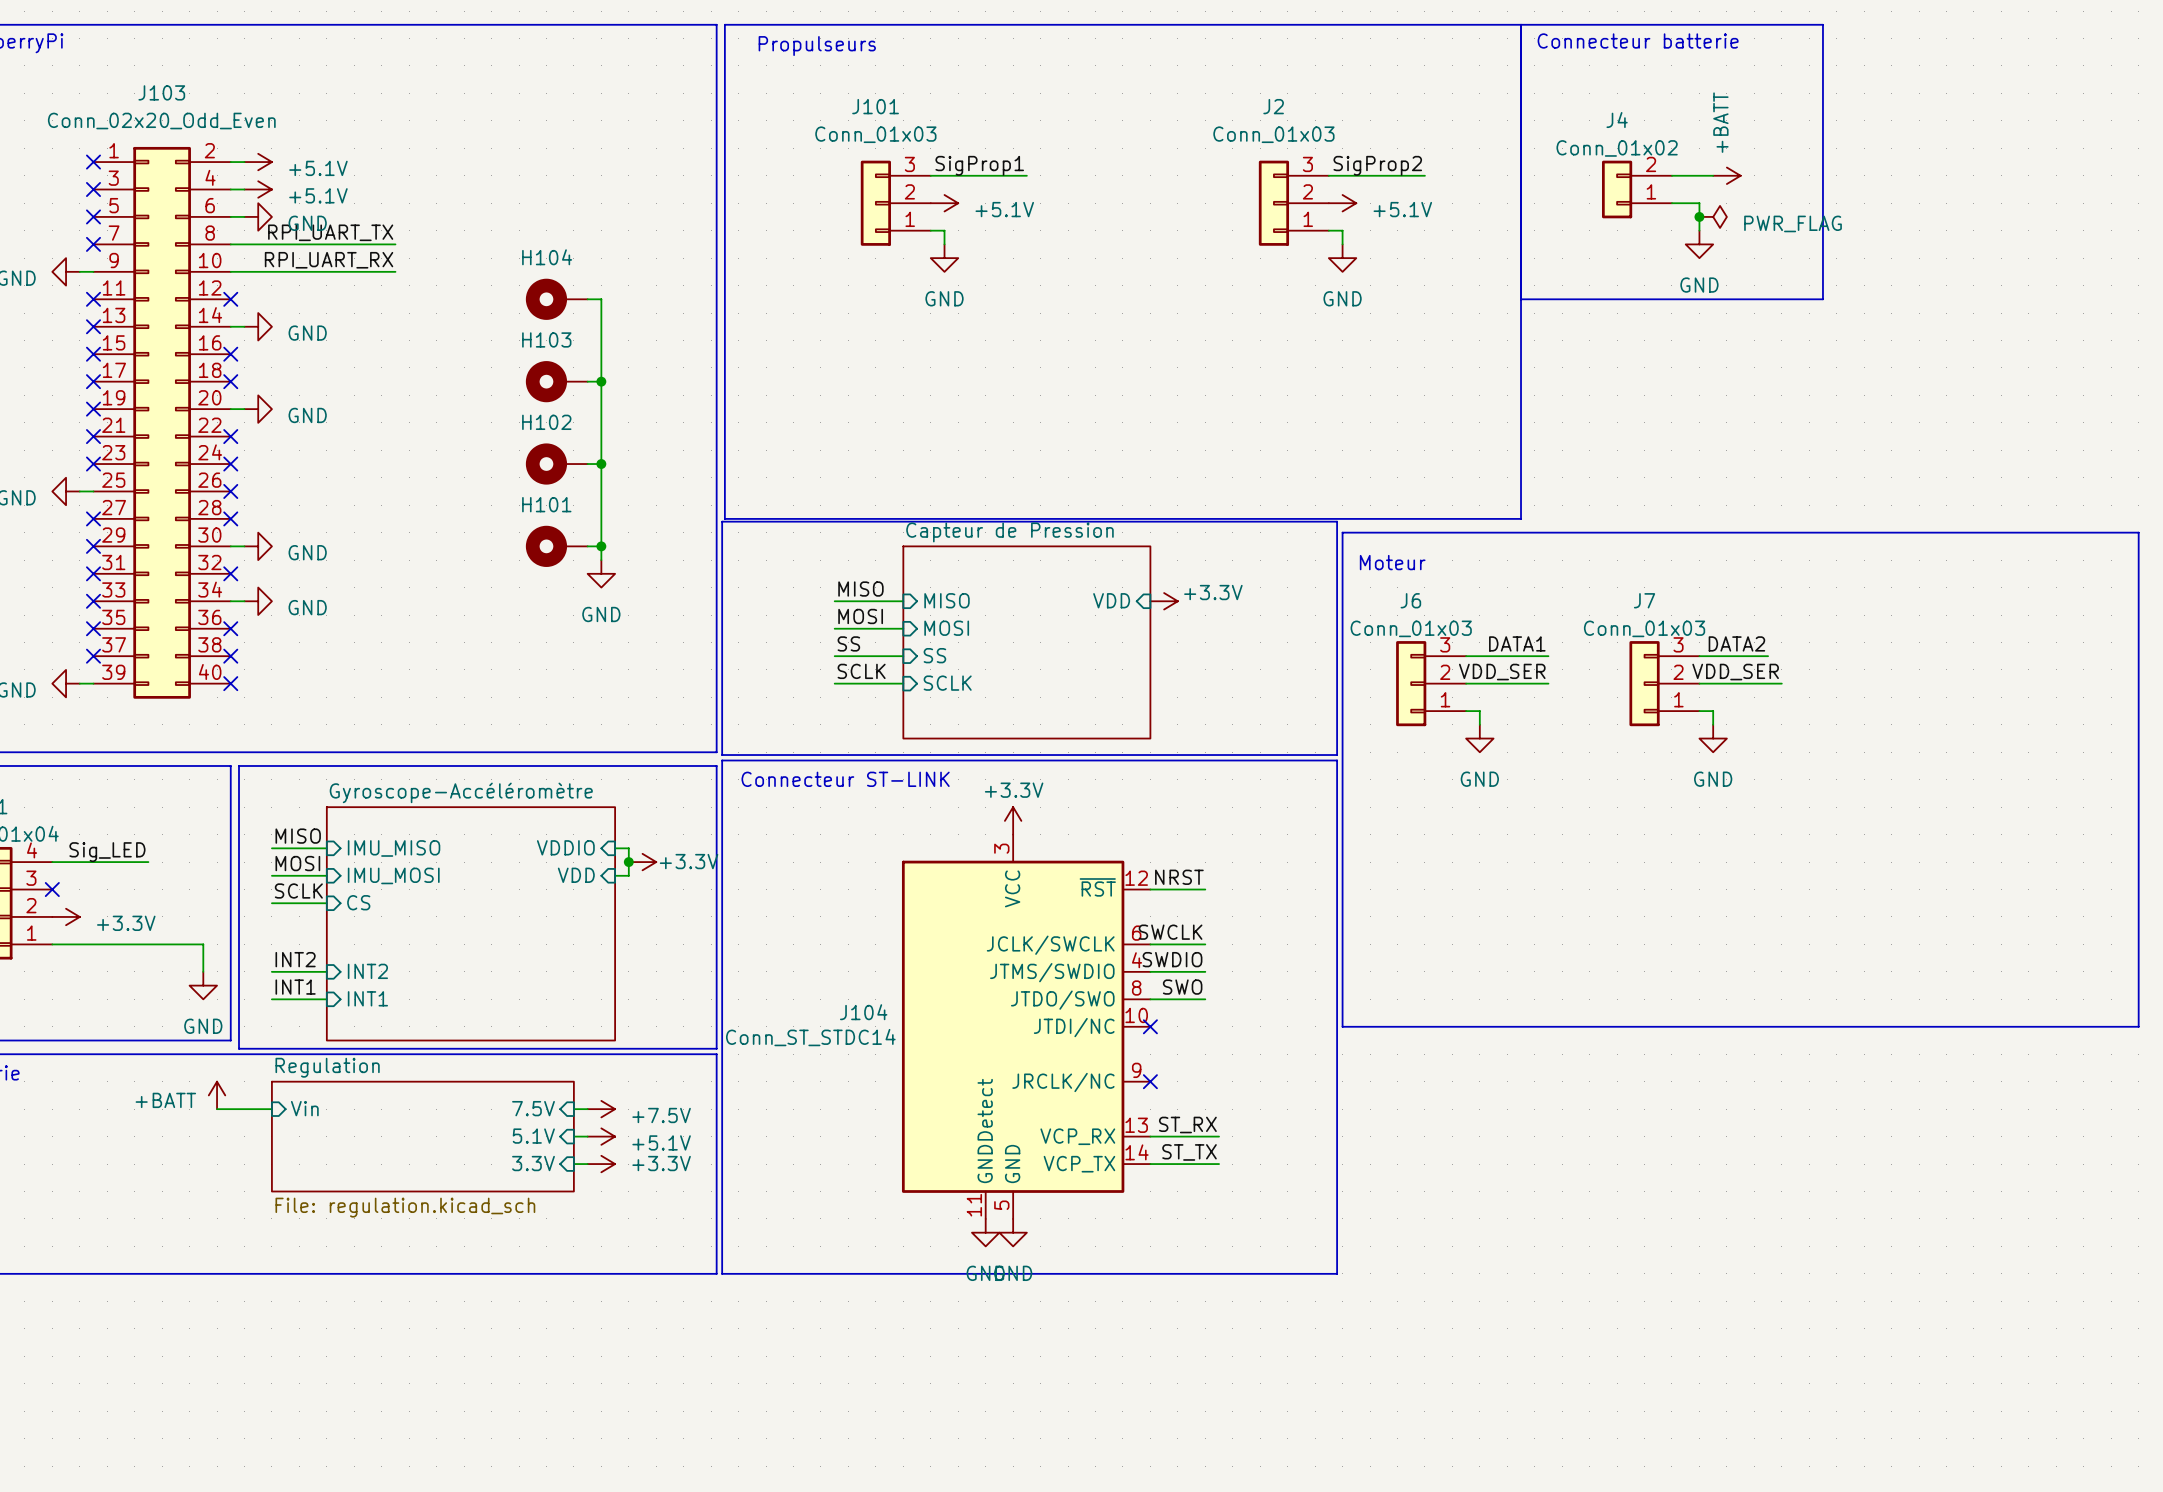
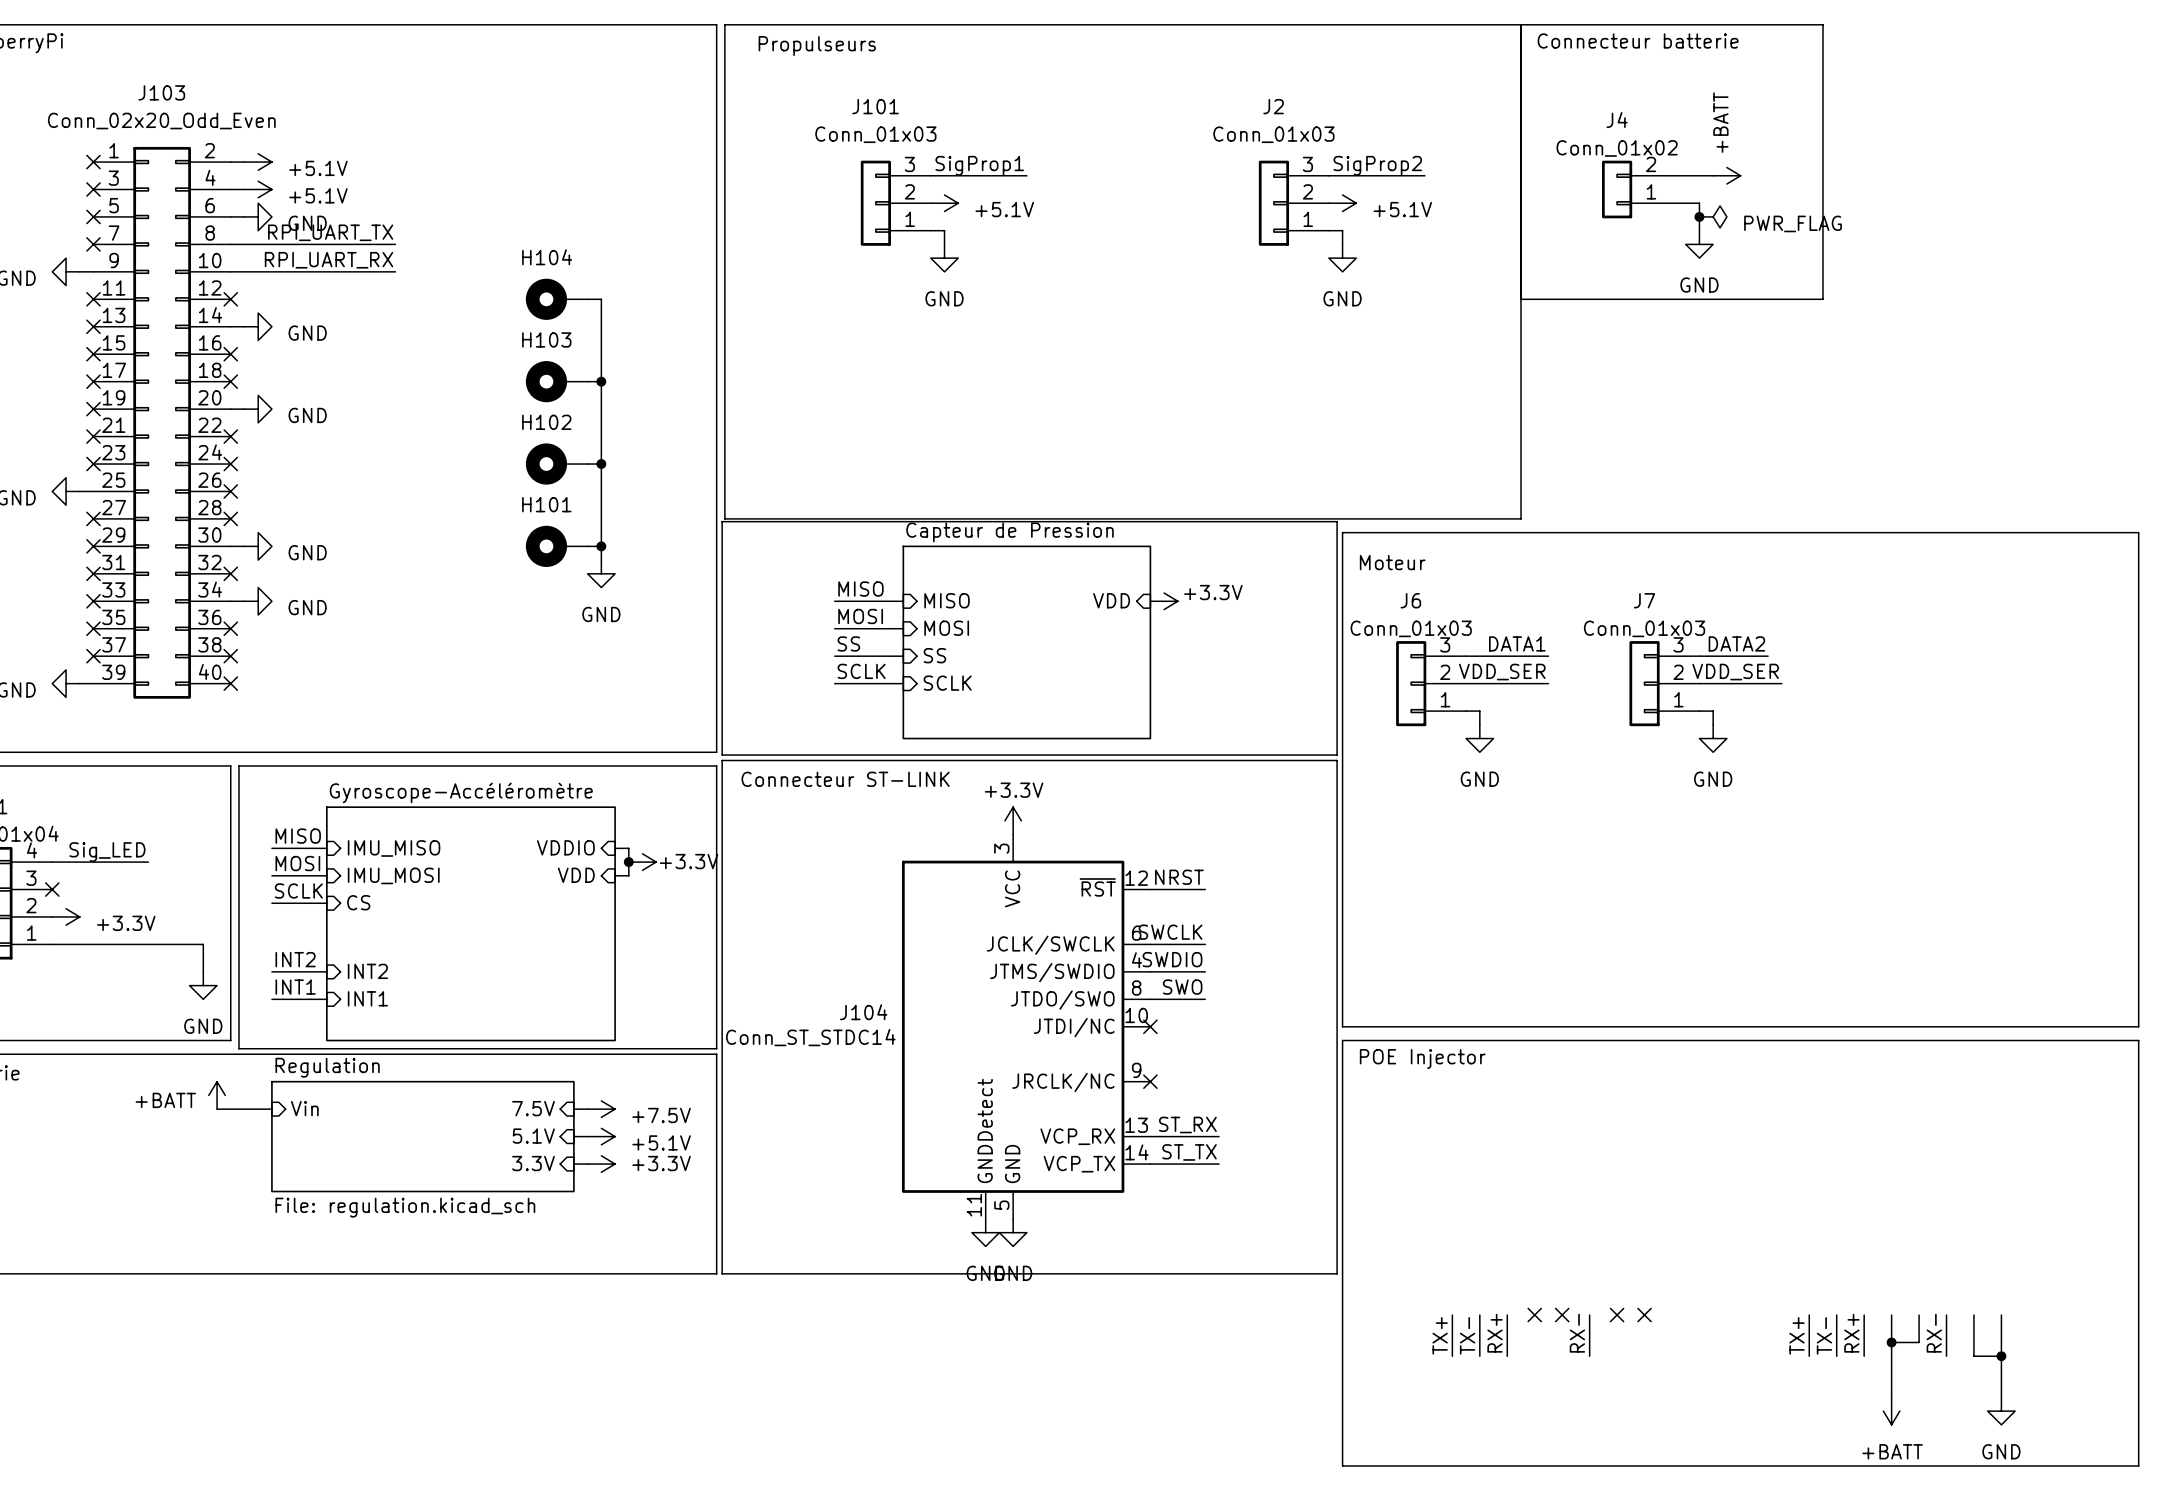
line: none -> (1342, 1040) (2138, 1040) (2138, 1466) (1342, 1466) (1342, 1040)
text: none -> POE Injector (1422, 1059)
wire: none -> (1452, 1315) (1452, 1356)
wire: none -> (1479, 1315) (1479, 1356)
wire: none -> (1507, 1315) (1507, 1356)
no-connect mark: none -> (1534, 1315)
no-connect mark: none -> (1562, 1315)
wire: none -> (1589, 1315) (1589, 1356)
no-connect mark: none -> (1617, 1315)
no-connect mark: none -> (1644, 1315)
wire: none -> (1809, 1315) (1809, 1356)
wire: none -> (1836, 1315) (1836, 1356)
wire: none -> (1864, 1315) (1864, 1356)
wire: none -> (1891, 1315) (1891, 1397)
wire: none -> (1919, 1315) (1919, 1342) (1891, 1342)
wire: none -> (1946, 1315) (1946, 1356)
wire: none -> (1973, 1315) (1973, 1356) (2001, 1356)
wire: none -> (2001, 1315) (2001, 1397)
label: none -> RX+ (1495, 1333)
label: none -> RX- (1577, 1333)
label: none -> RX+ (1851, 1333)
label: none -> RX- (1934, 1333)
label: none -> TX+ (1440, 1335)
label: none -> TX- (1467, 1335)
label: none -> TX+ (1797, 1335)
label: none -> TX- (1824, 1335)
junction: none -> (1891, 1342)
junction: none -> (2001, 1356)
power symbol: none -> +BATT (1891, 1411)
power symbol: none -> GND (2001, 1411)

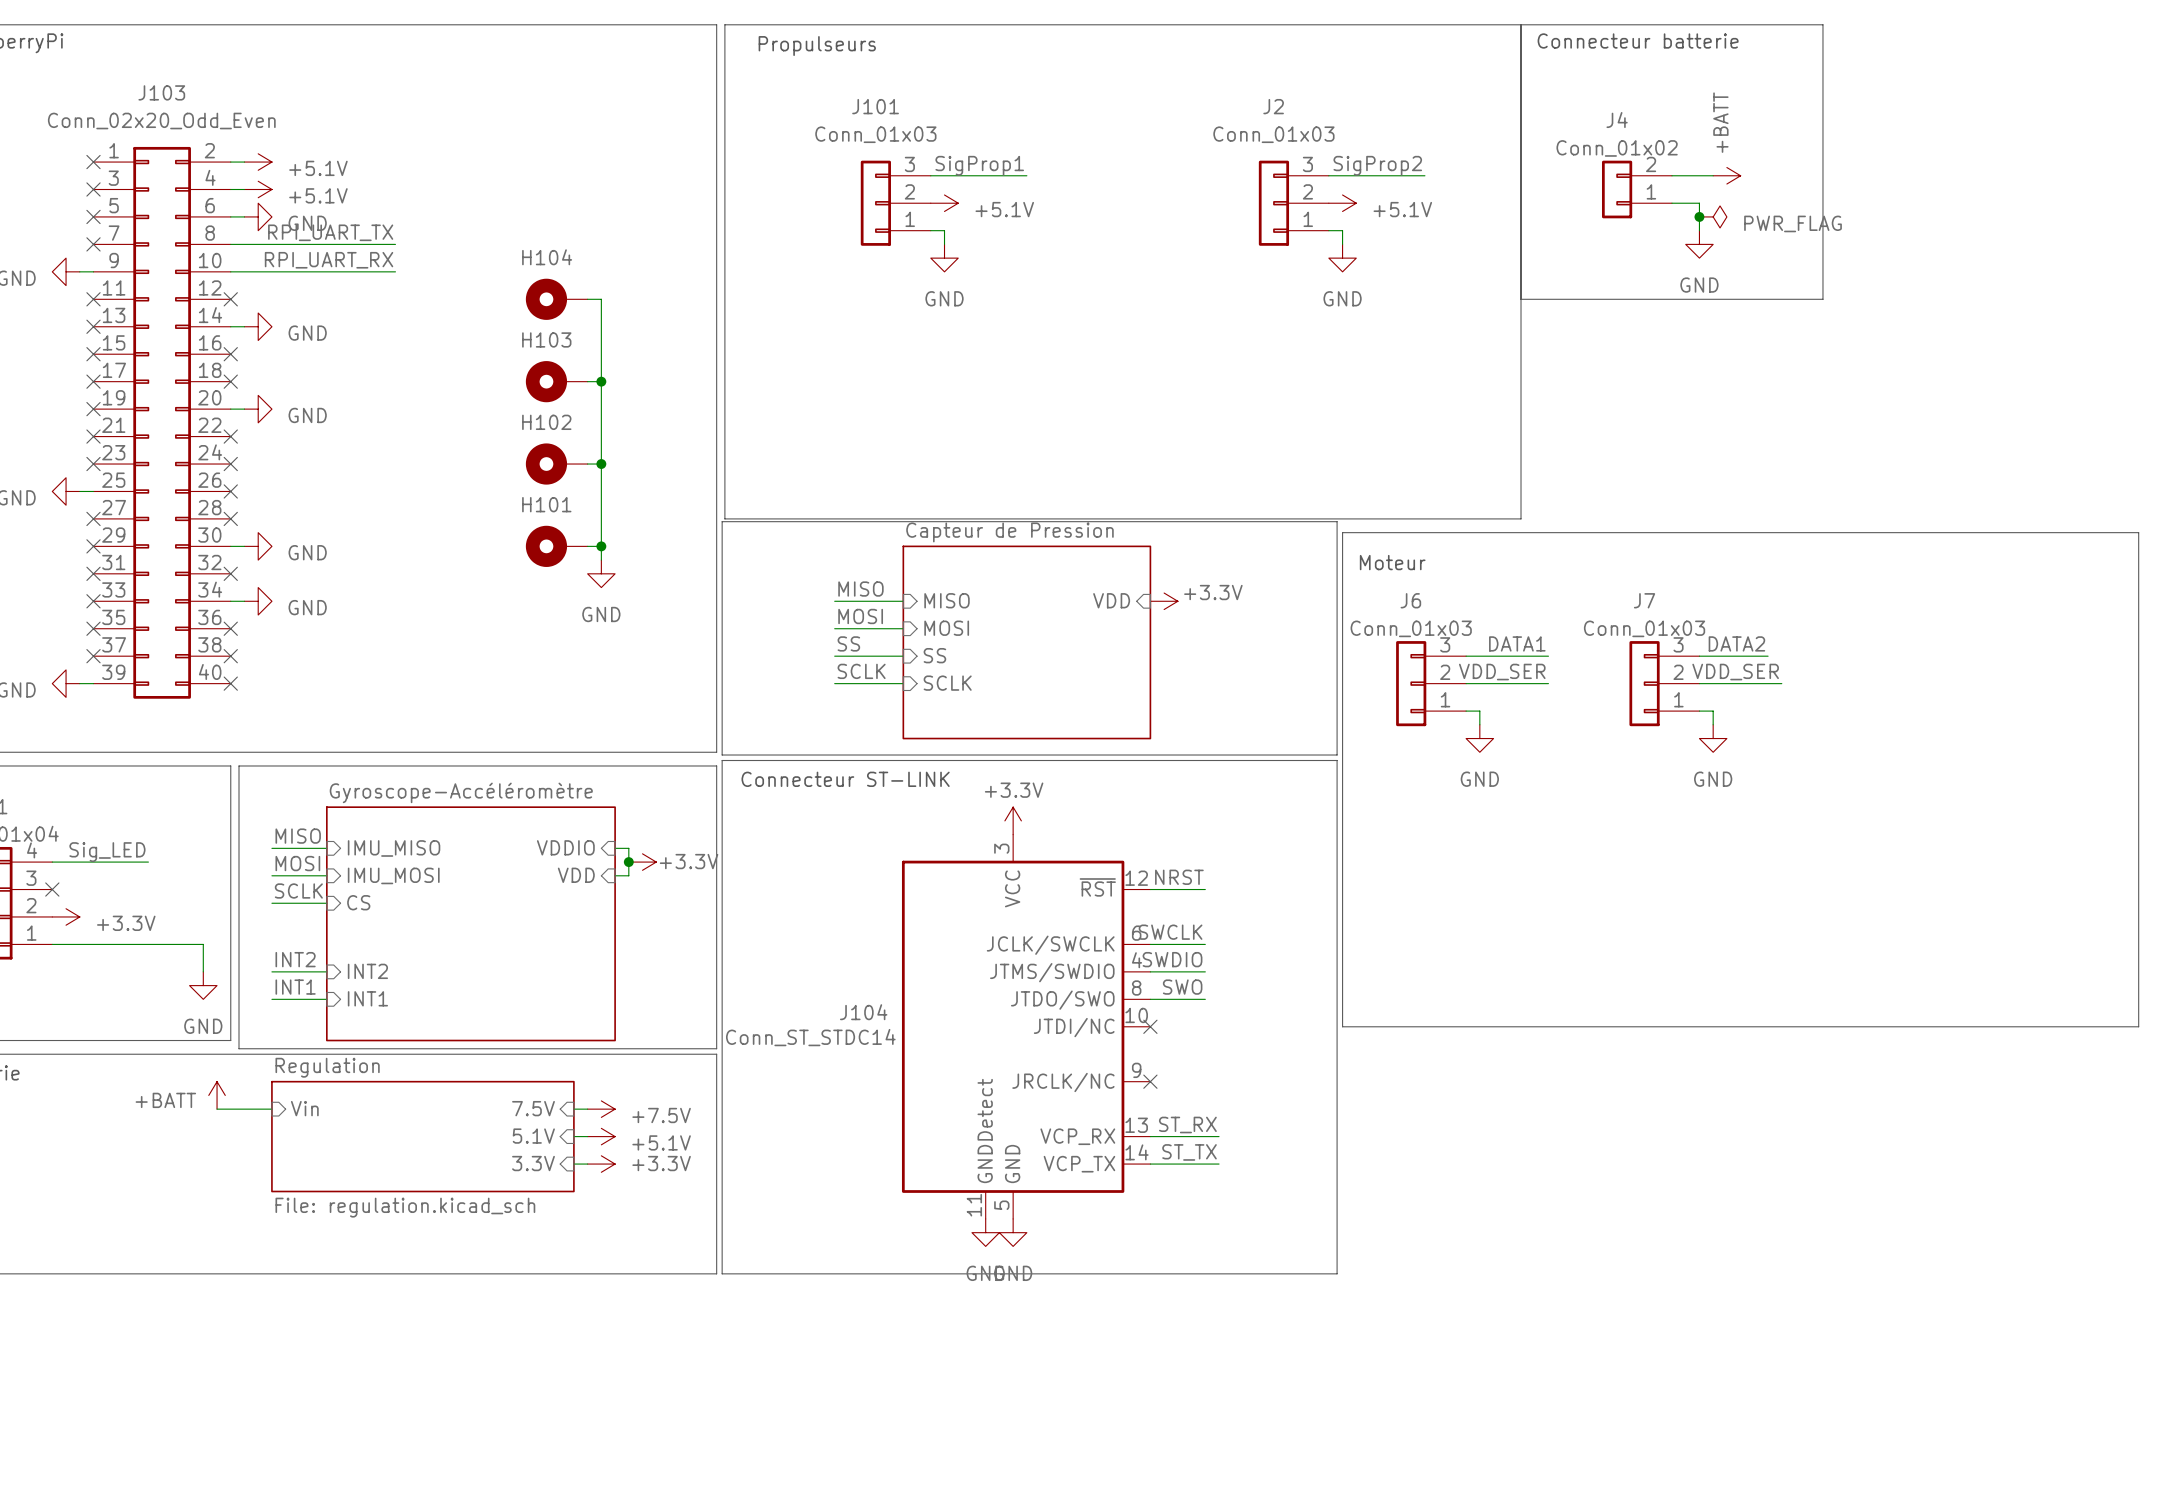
line: (1342, 1040) (2138, 1040) (2138, 1466) (1342, 1466) (1342, 1040) -> none
text: POE Injector (1422, 1059) -> none
wire: (1452, 1315) (1452, 1356) -> none
wire: (1479, 1315) (1479, 1356) -> none
wire: (1507, 1315) (1507, 1356) -> none
no-connect mark: (1534, 1315) -> none
no-connect mark: (1562, 1315) -> none
wire: (1589, 1315) (1589, 1356) -> none
no-connect mark: (1617, 1315) -> none
no-connect mark: (1644, 1315) -> none
wire: (1809, 1315) (1809, 1356) -> none
wire: (1836, 1315) (1836, 1356) -> none
wire: (1864, 1315) (1864, 1356) -> none
wire: (1891, 1315) (1891, 1397) -> none
wire: (1919, 1315) (1919, 1342) (1891, 1342) -> none
wire: (1946, 1315) (1946, 1356) -> none
wire: (1973, 1315) (1973, 1356) (2001, 1356) -> none
wire: (2001, 1315) (2001, 1397) -> none
label: RX+ (1495, 1333) -> none
label: RX- (1577, 1333) -> none
label: RX+ (1851, 1333) -> none
label: RX- (1934, 1333) -> none
label: TX+ (1440, 1335) -> none
label: TX- (1467, 1335) -> none
label: TX+ (1797, 1335) -> none
label: TX- (1824, 1335) -> none
junction: (1891, 1342) -> none
junction: (2001, 1356) -> none
power symbol: +BATT (1891, 1411) -> none
power symbol: GND (2001, 1411) -> none

